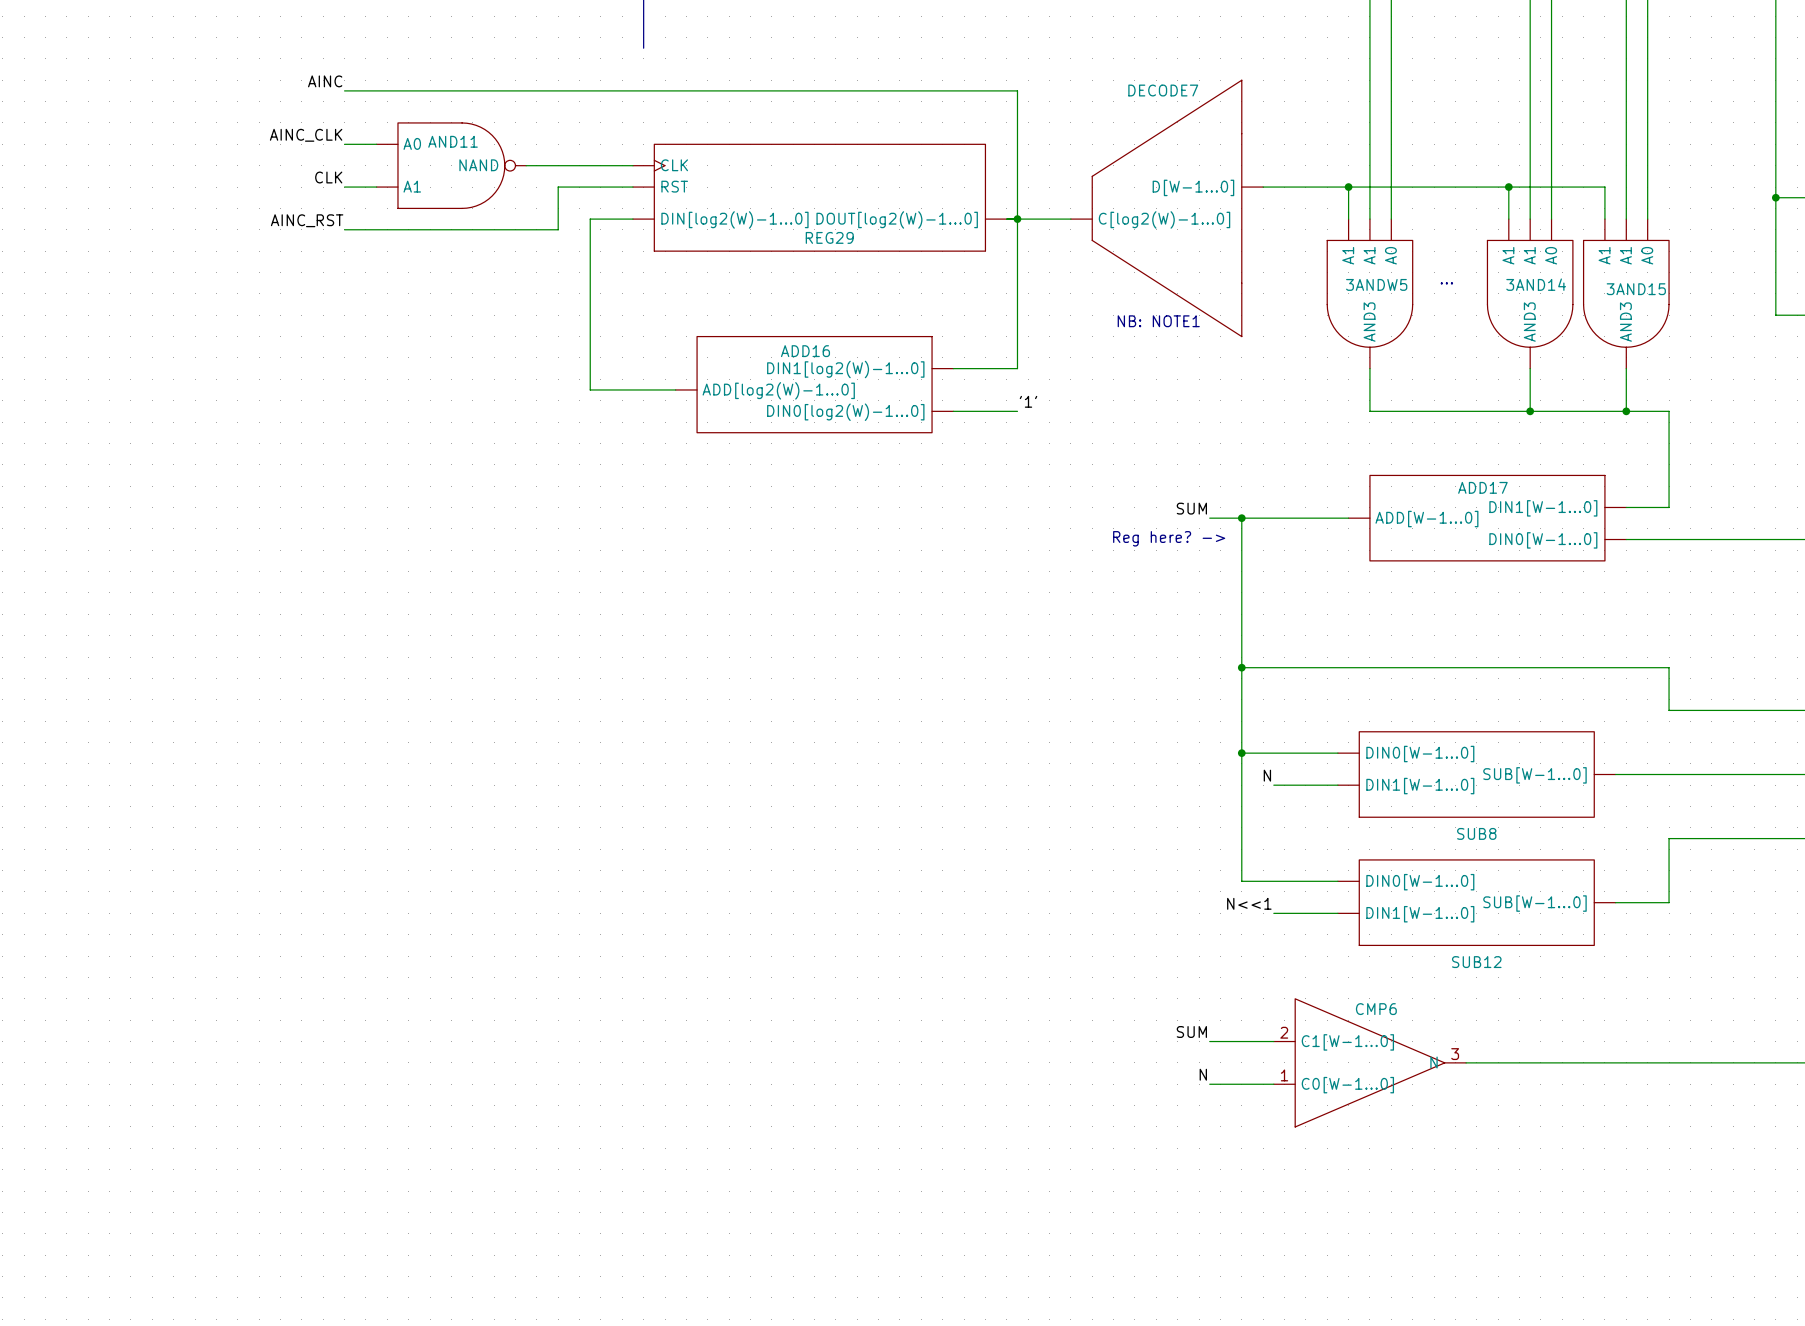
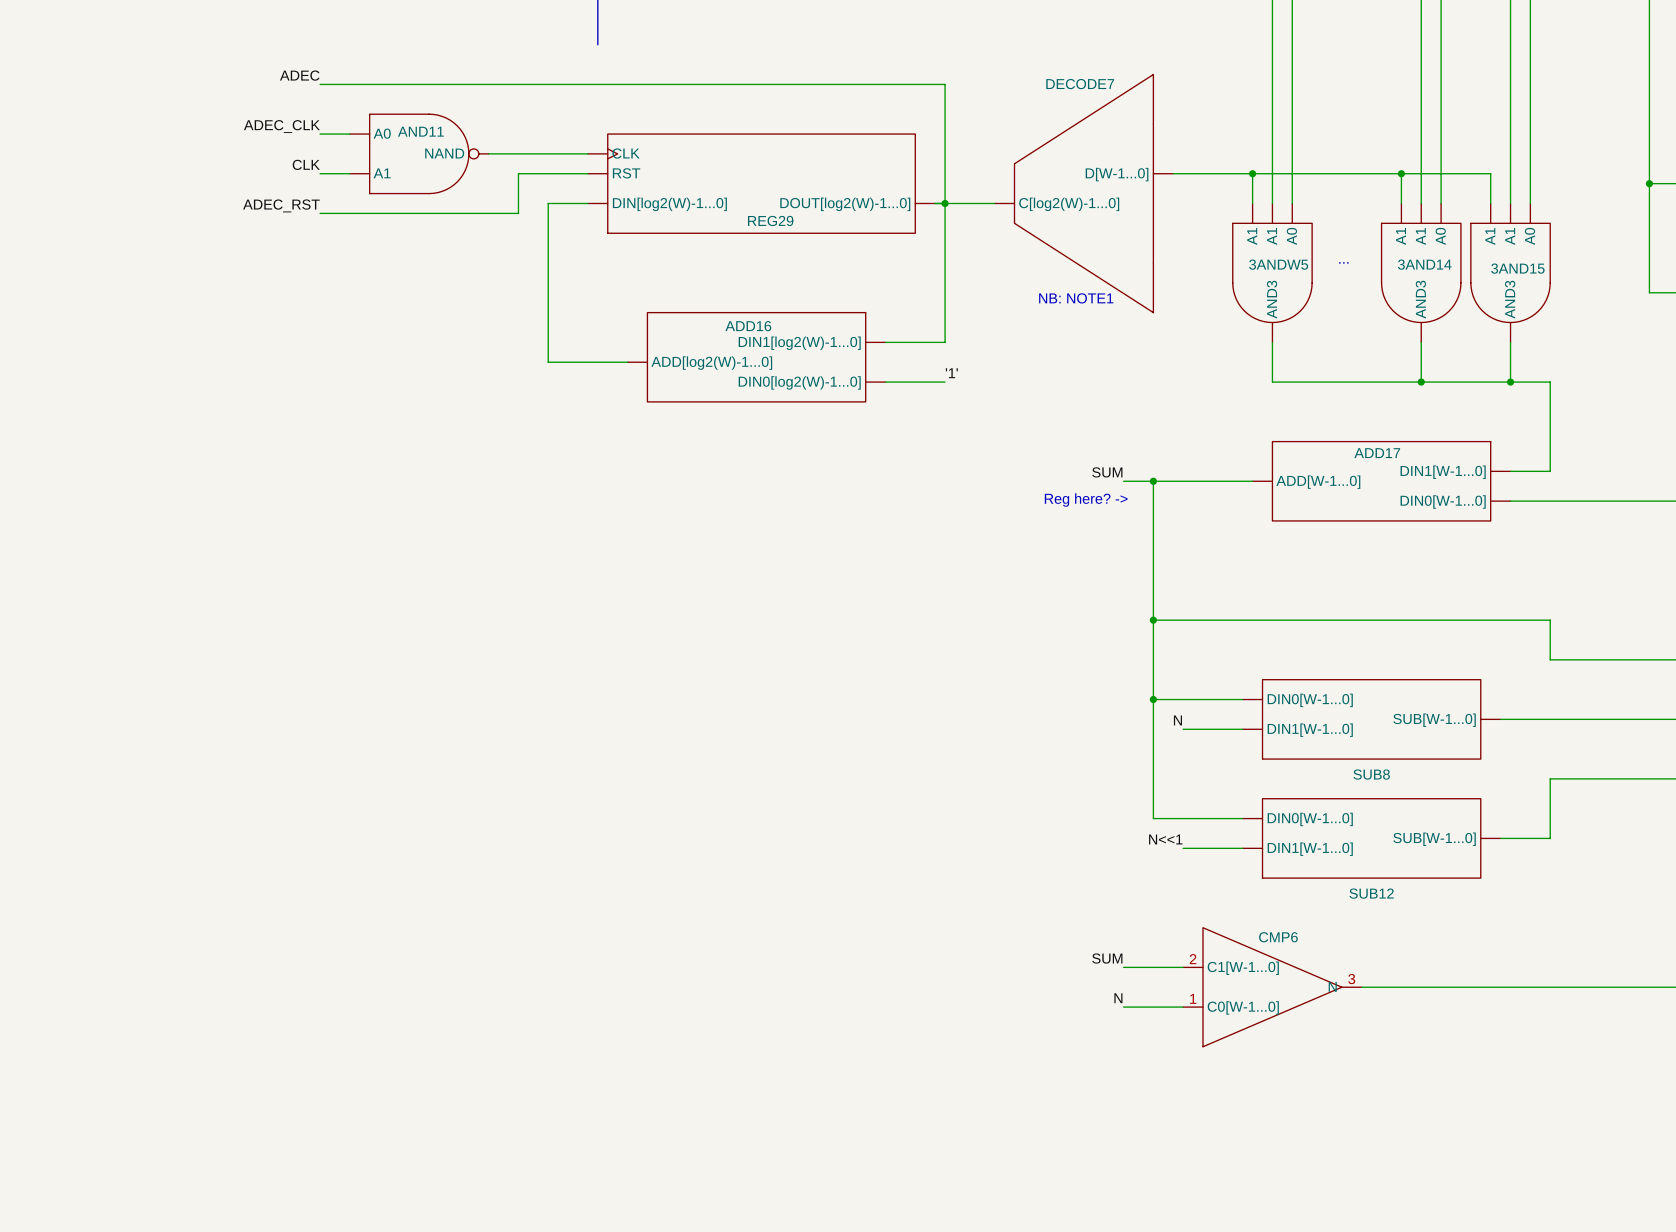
label: AINC (325, 81) -> ADEC (299, 75)
label: AINC_CLK (306, 135) -> ADEC_CLK (281, 126)
label: AINC_RST (307, 220) -> ADEC_RST (281, 205)

